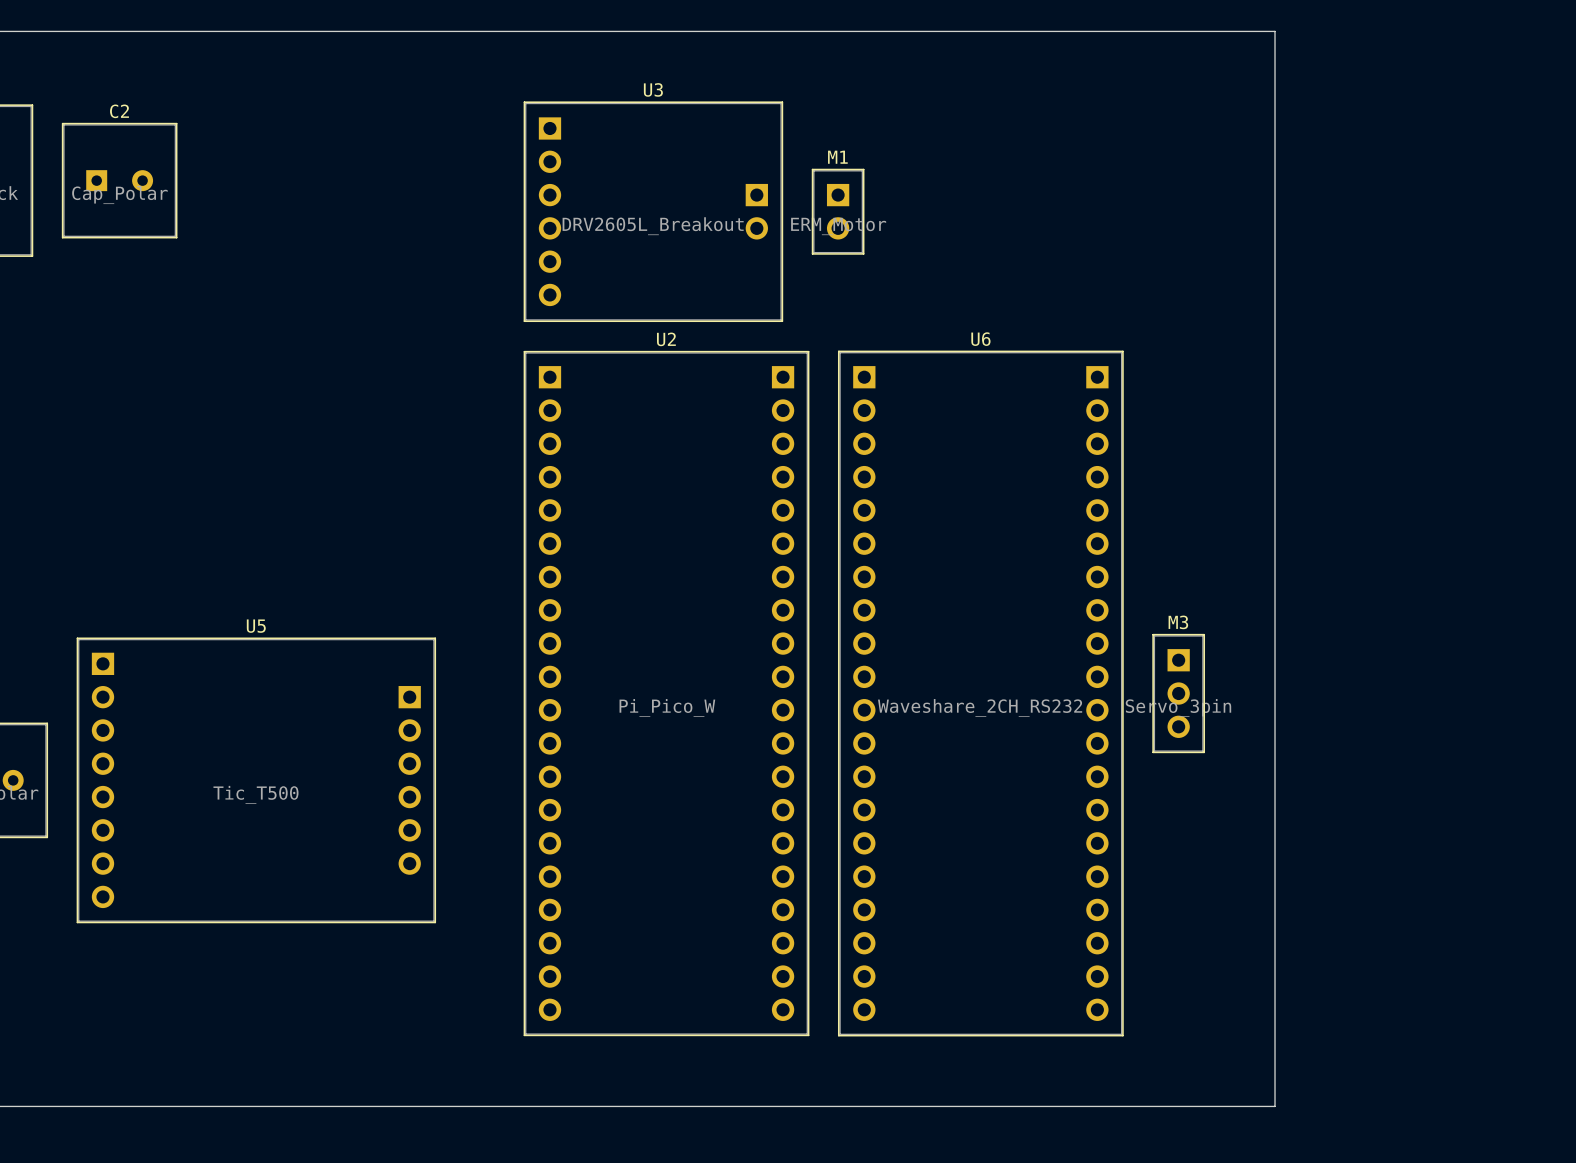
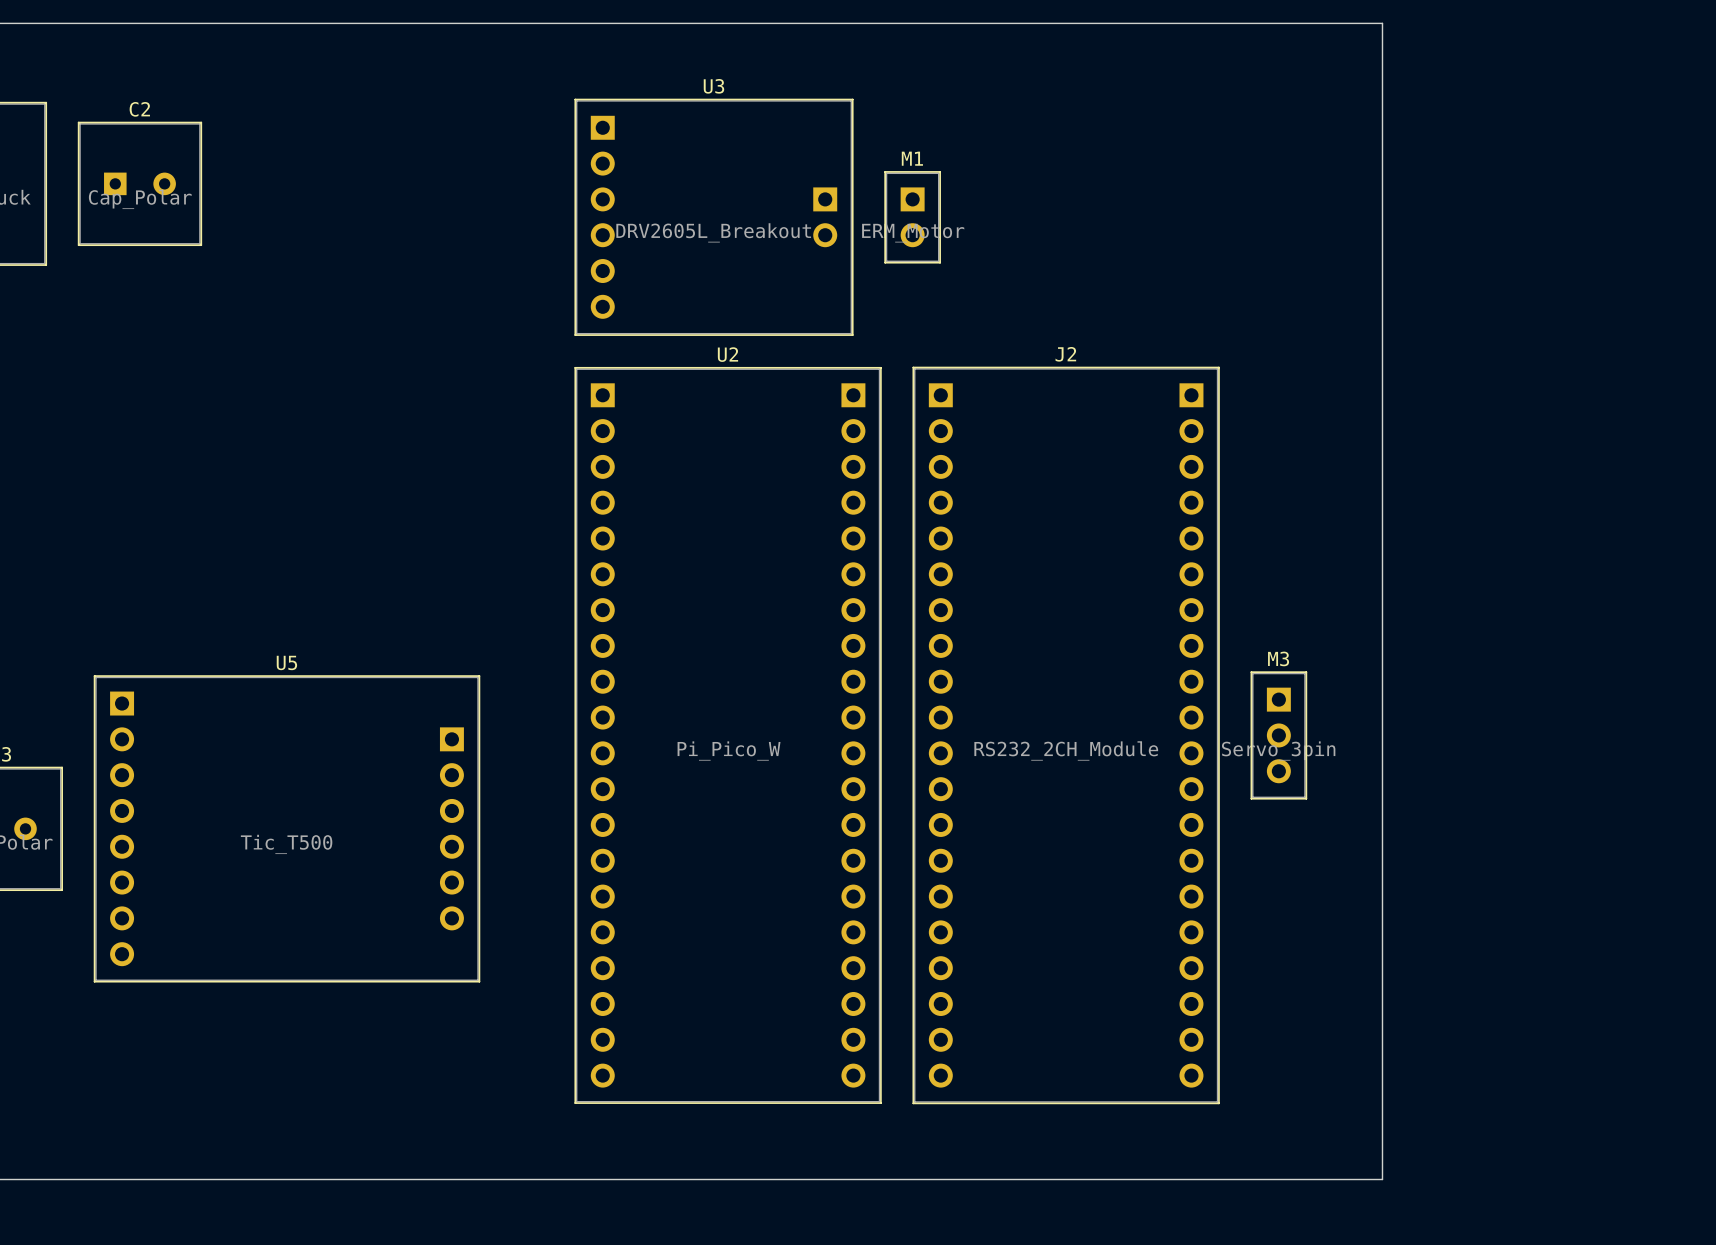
U6 name: U6 (980, 339) -> J2 (1065, 354)
U6 value: Waveshare_2CH_RS232 (980, 707) -> RS232_2CH_Module (1066, 750)

